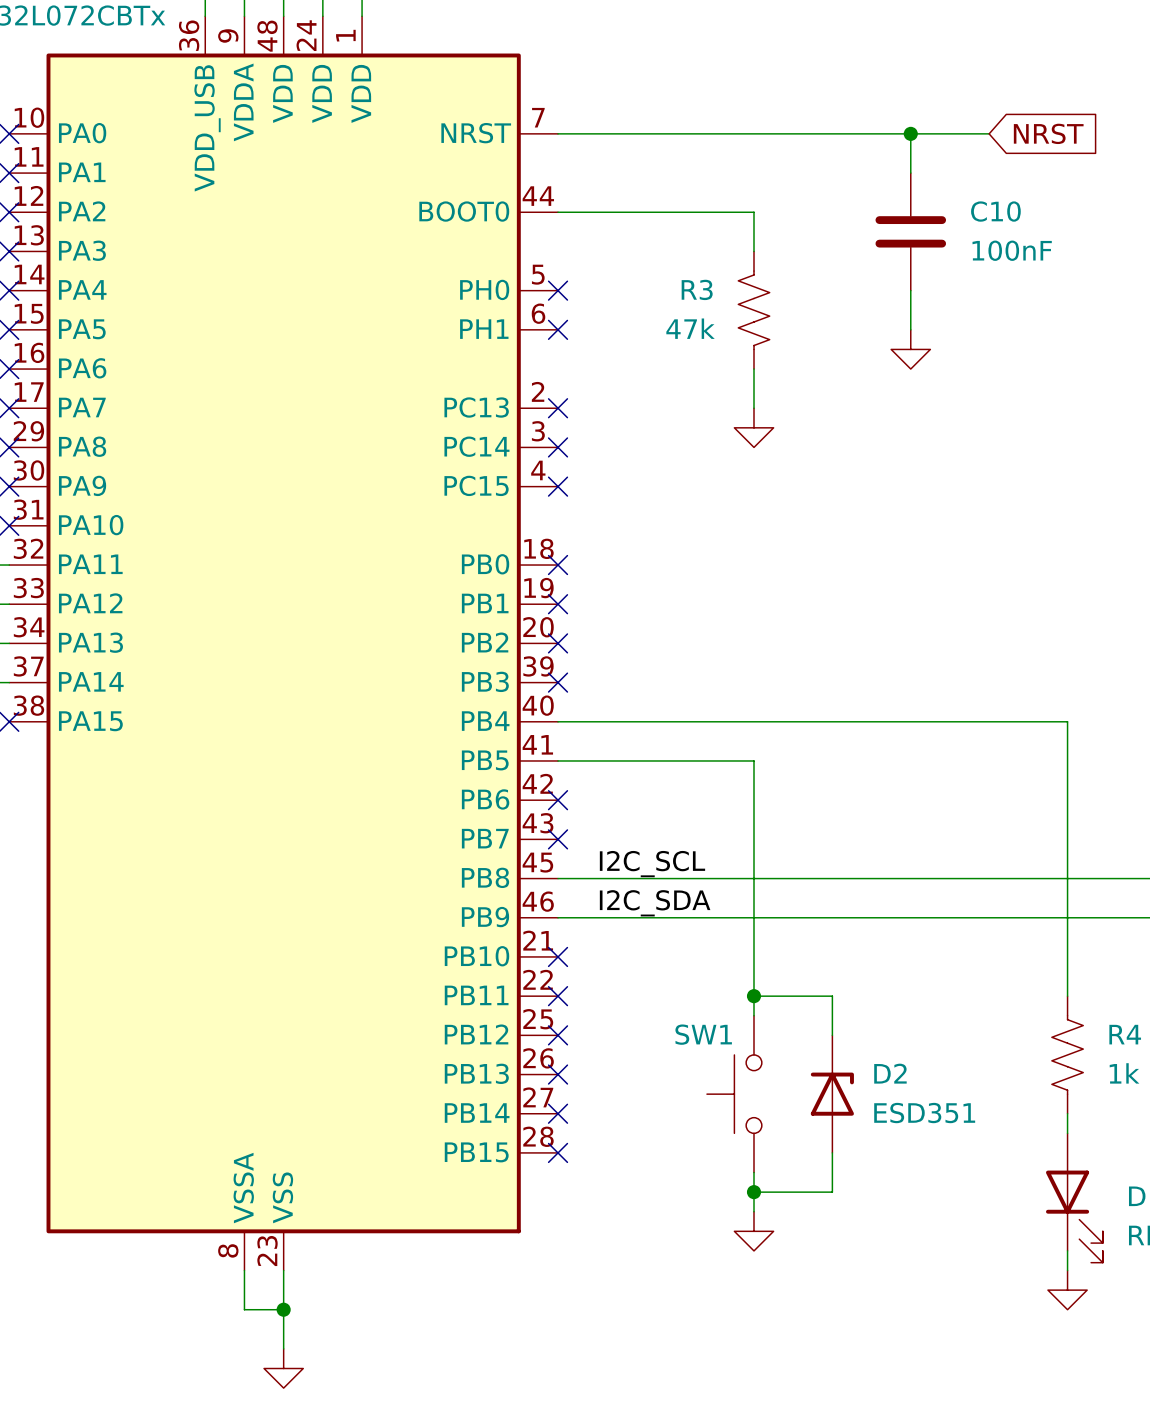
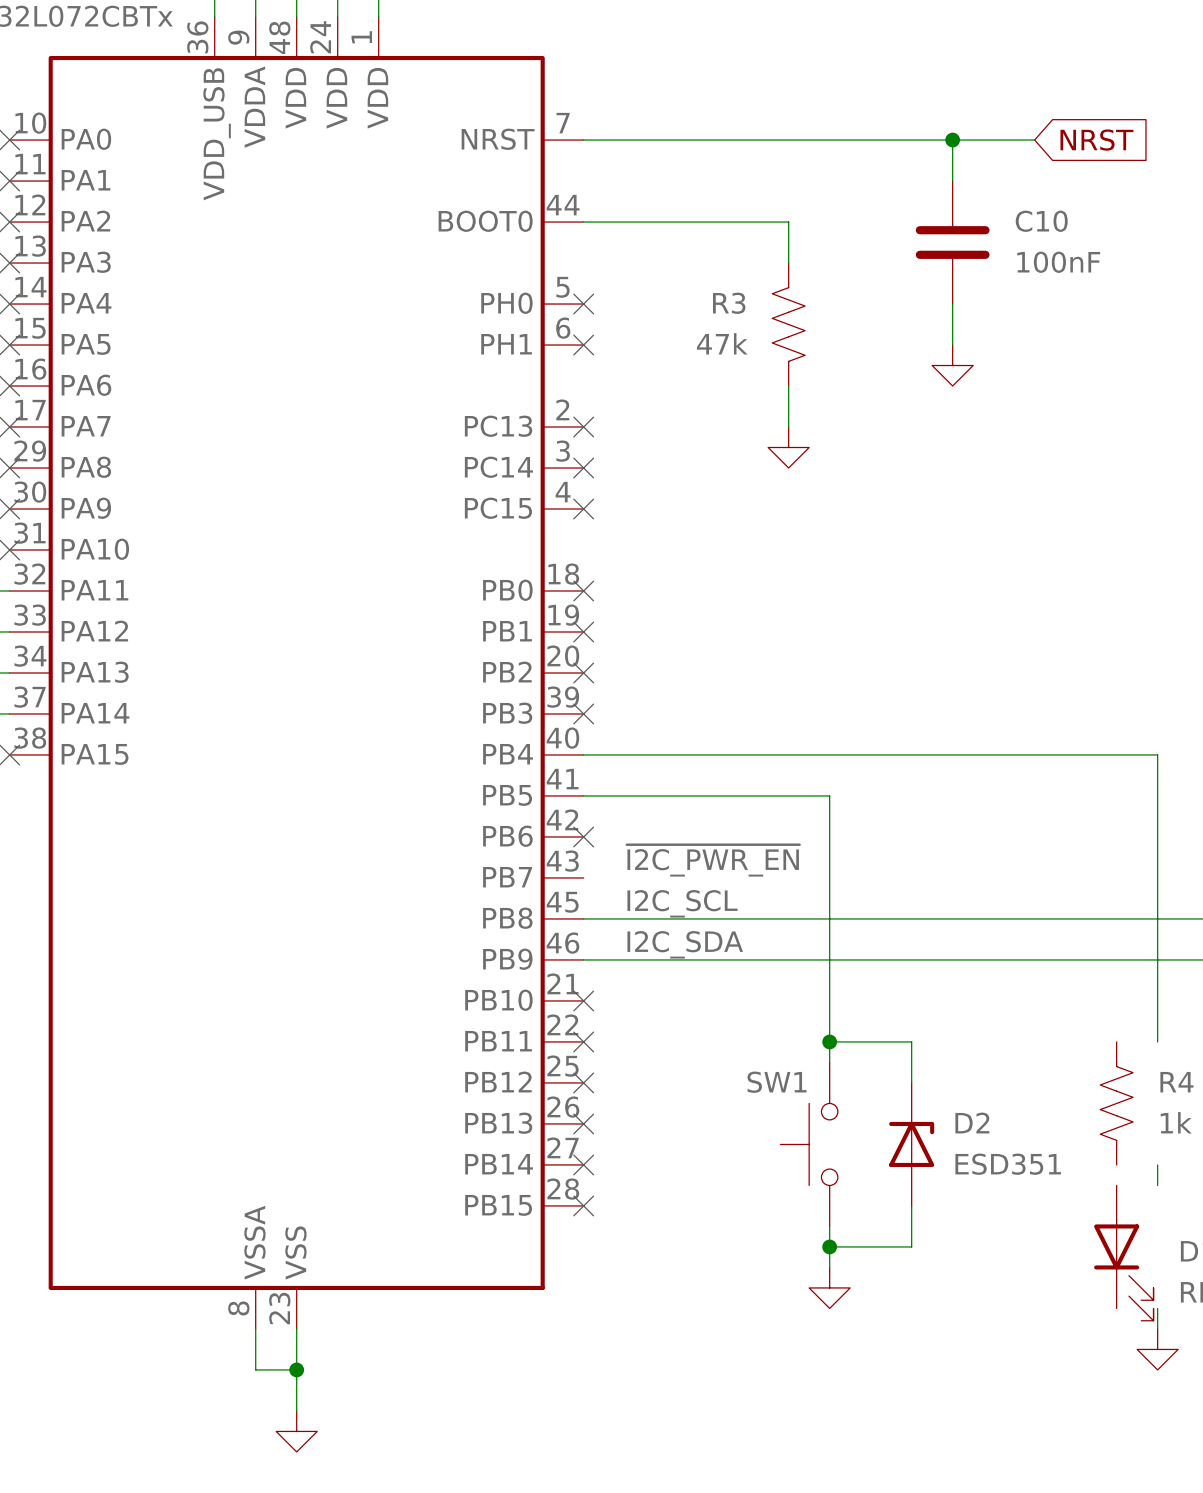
wire: (1067, 721) (1067, 996) -> (1116, 754) (1157, 754) (1157, 1041)
wire: (753, 760) (753, 1015) -> (788, 795) (829, 795) (829, 1062)
label: none -> ~{I2C_PWR_EN} (713, 860)
no-connect mark: (558, 839) -> none
wire: (753, 996) (793, 996) -> none
junction position: (753, 996) -> (829, 1041)
wire: (832, 996) (832, 1035) -> (870, 1041) (911, 1041) (911, 1082)
SW1 position: (734, 1094) -> (809, 1144)
D2 position: (832, 1094) -> (911, 1144)
wire: (1067, 1113) (1067, 1133) -> (1157, 1164) (1157, 1185)
wire: (832, 1152) (832, 1192) -> (911, 1205) (911, 1246) (870, 1246)
wire: (753, 1172) (753, 1211) -> (829, 1226) (829, 1267)
wire: (753, 1192) (793, 1192) -> none
junction position: (753, 1192) -> (829, 1246)
power symbol position: (753, 1231) -> (829, 1287)
wire: (1067, 1250) (1067, 1270) -> (1157, 1308) (1157, 1328)
power symbol position: (1067, 1290) -> (1157, 1349)

